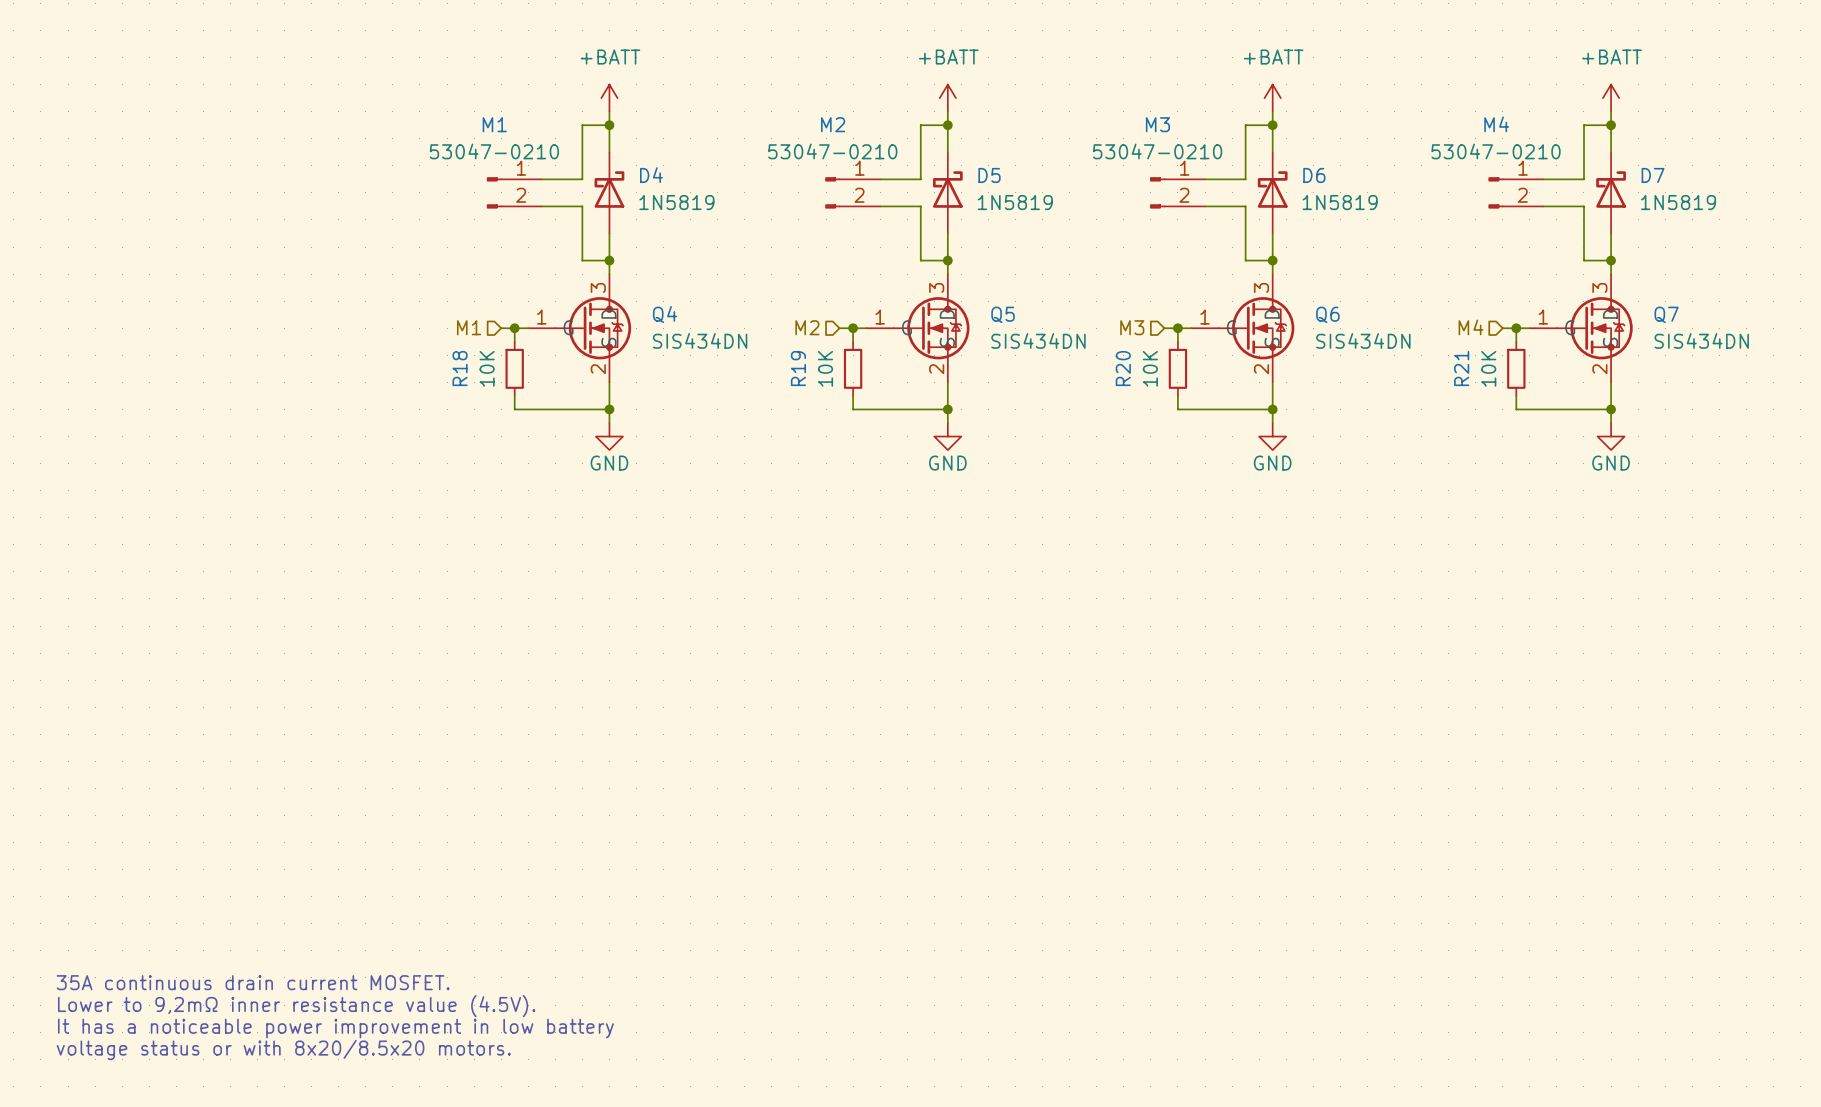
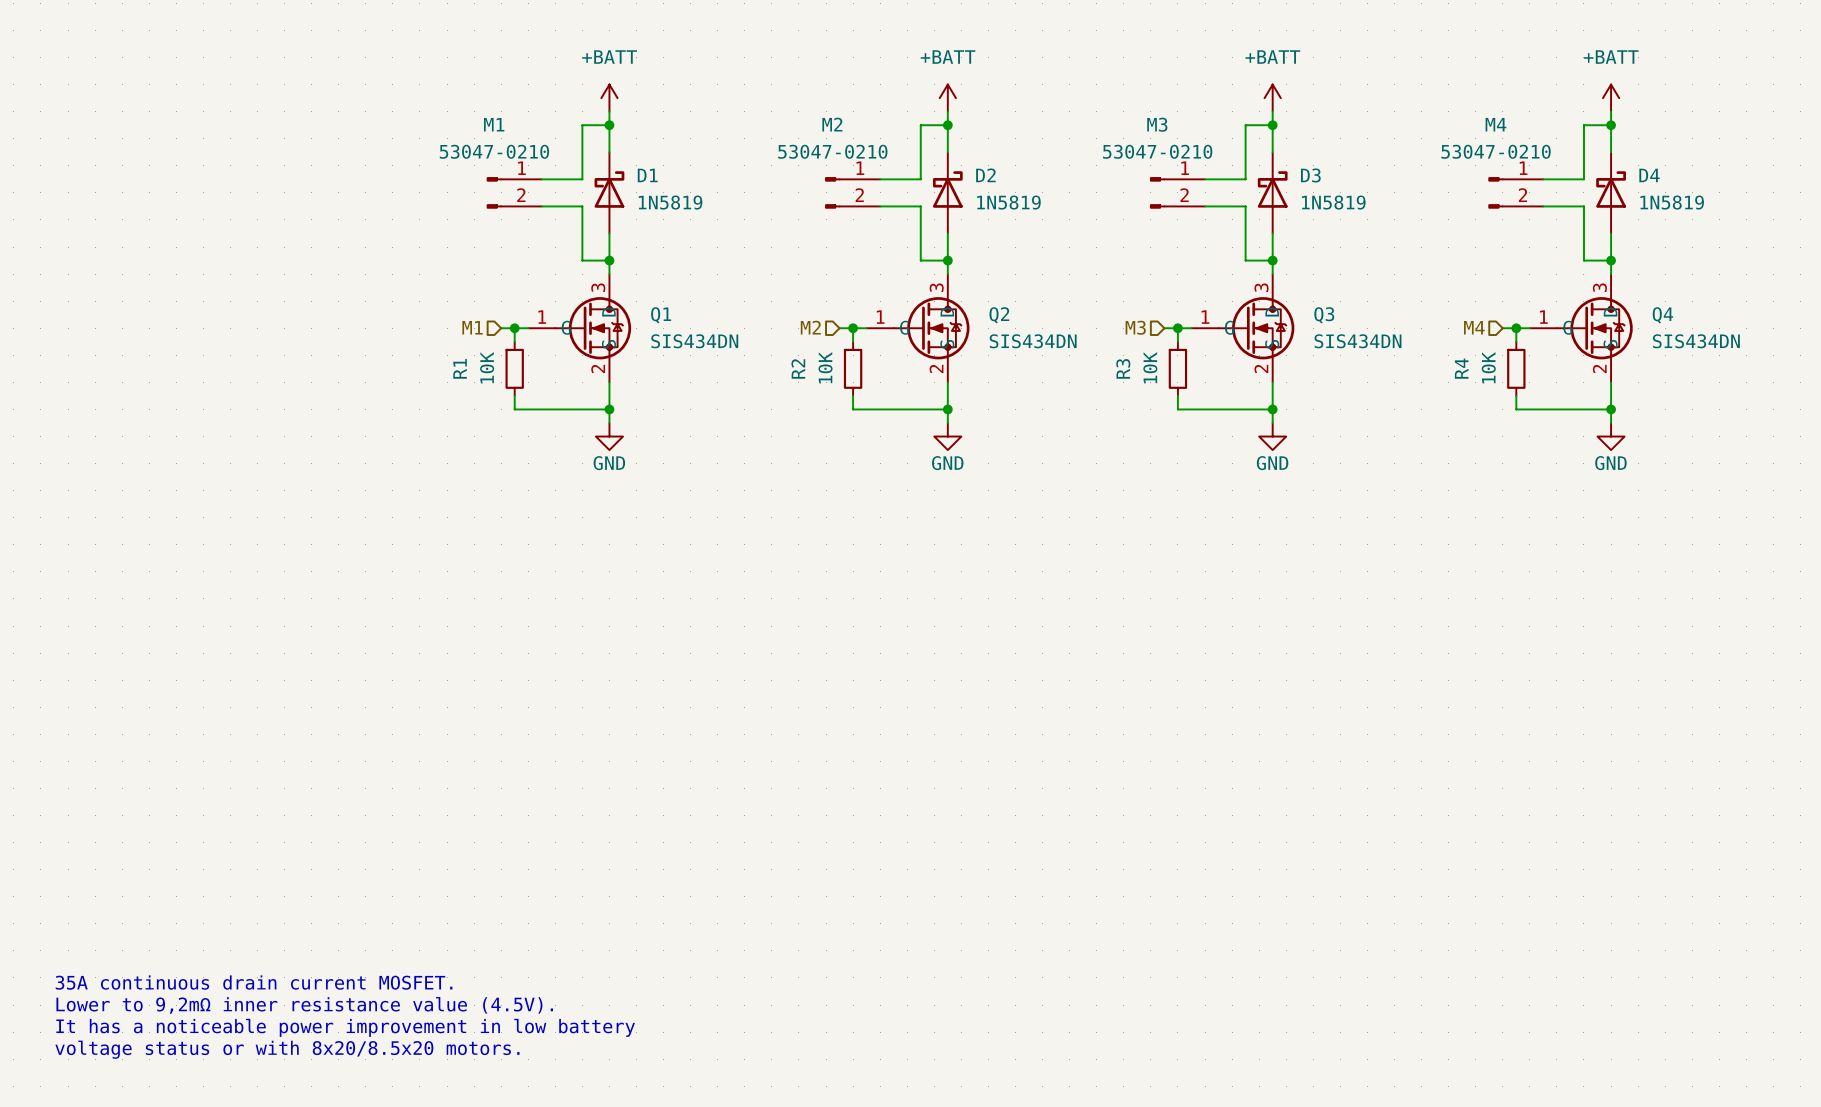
D4 name: D4 (651, 175) -> D1 (647, 175)
D5 name: D5 (989, 175) -> D2 (985, 175)
D6 name: D6 (1314, 175) -> D3 (1310, 175)
D7 name: D7 (1653, 175) -> D4 (1649, 175)
Q4 name: Q4 (664, 314) -> Q1 (661, 315)
Q5 name: Q5 (1003, 314) -> Q2 (999, 315)
Q6 name: Q6 (1327, 314) -> Q3 (1324, 315)
Q7 name: Q7 (1666, 314) -> Q4 (1662, 315)
R18 name: R18 (460, 368) -> R1 (460, 368)
R19 name: R19 (798, 368) -> R2 (798, 368)
R20 name: R20 (1123, 368) -> R3 (1123, 368)
R21 name: R21 (1461, 368) -> R4 (1461, 368)

